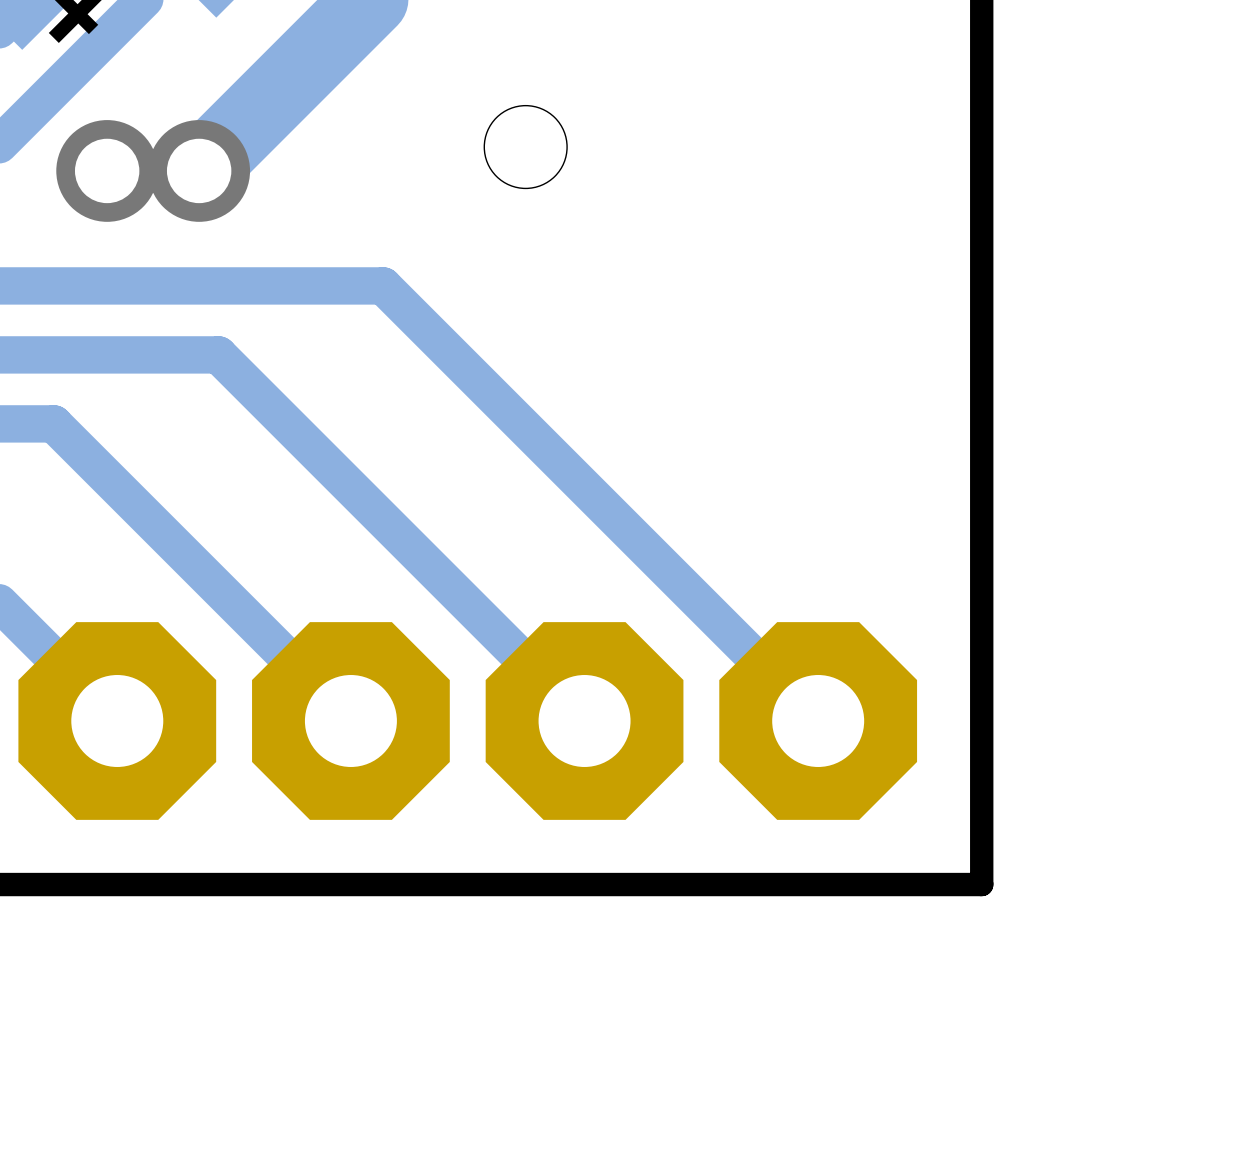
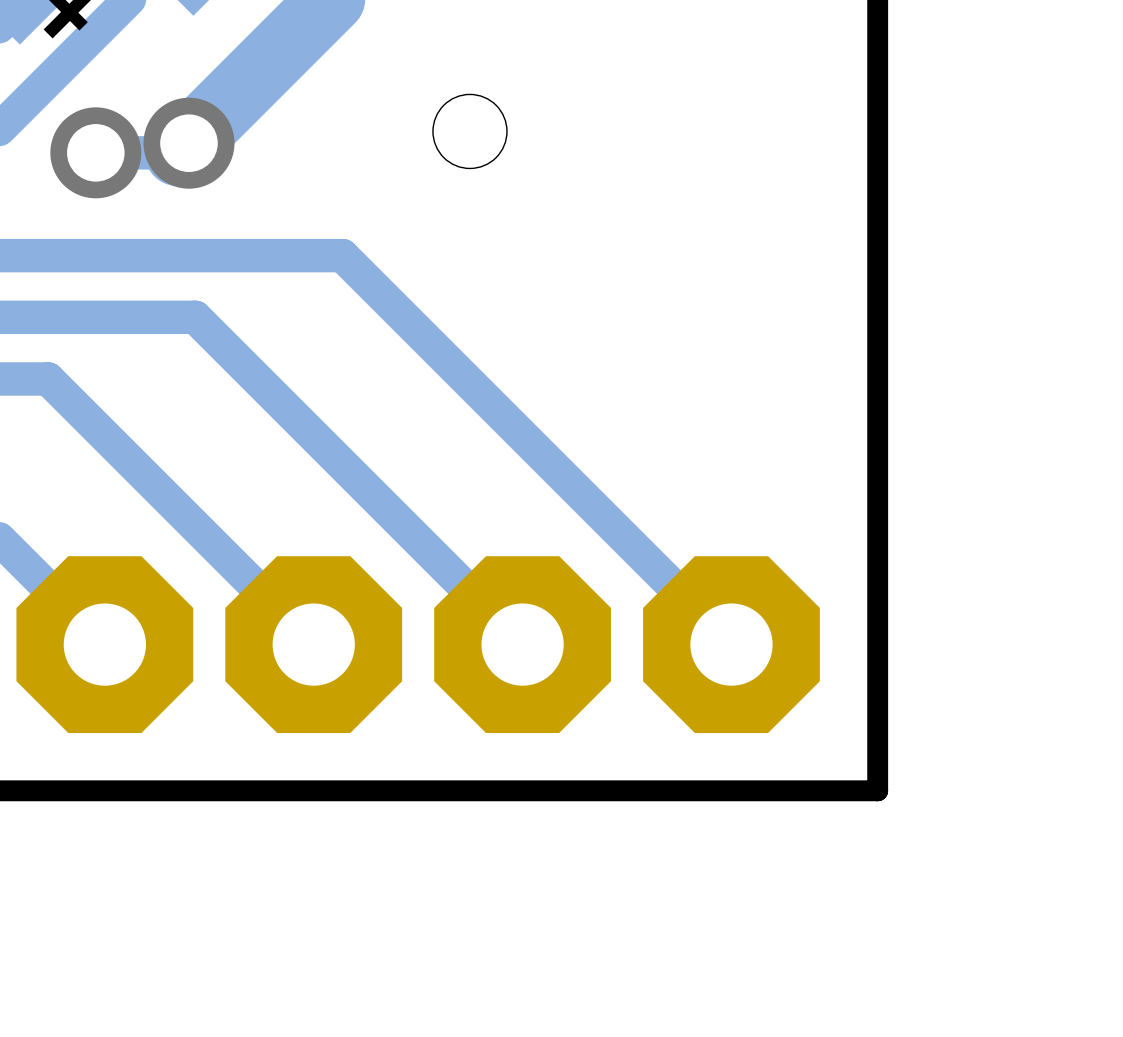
via position: (199, 170) -> (188, 143)

